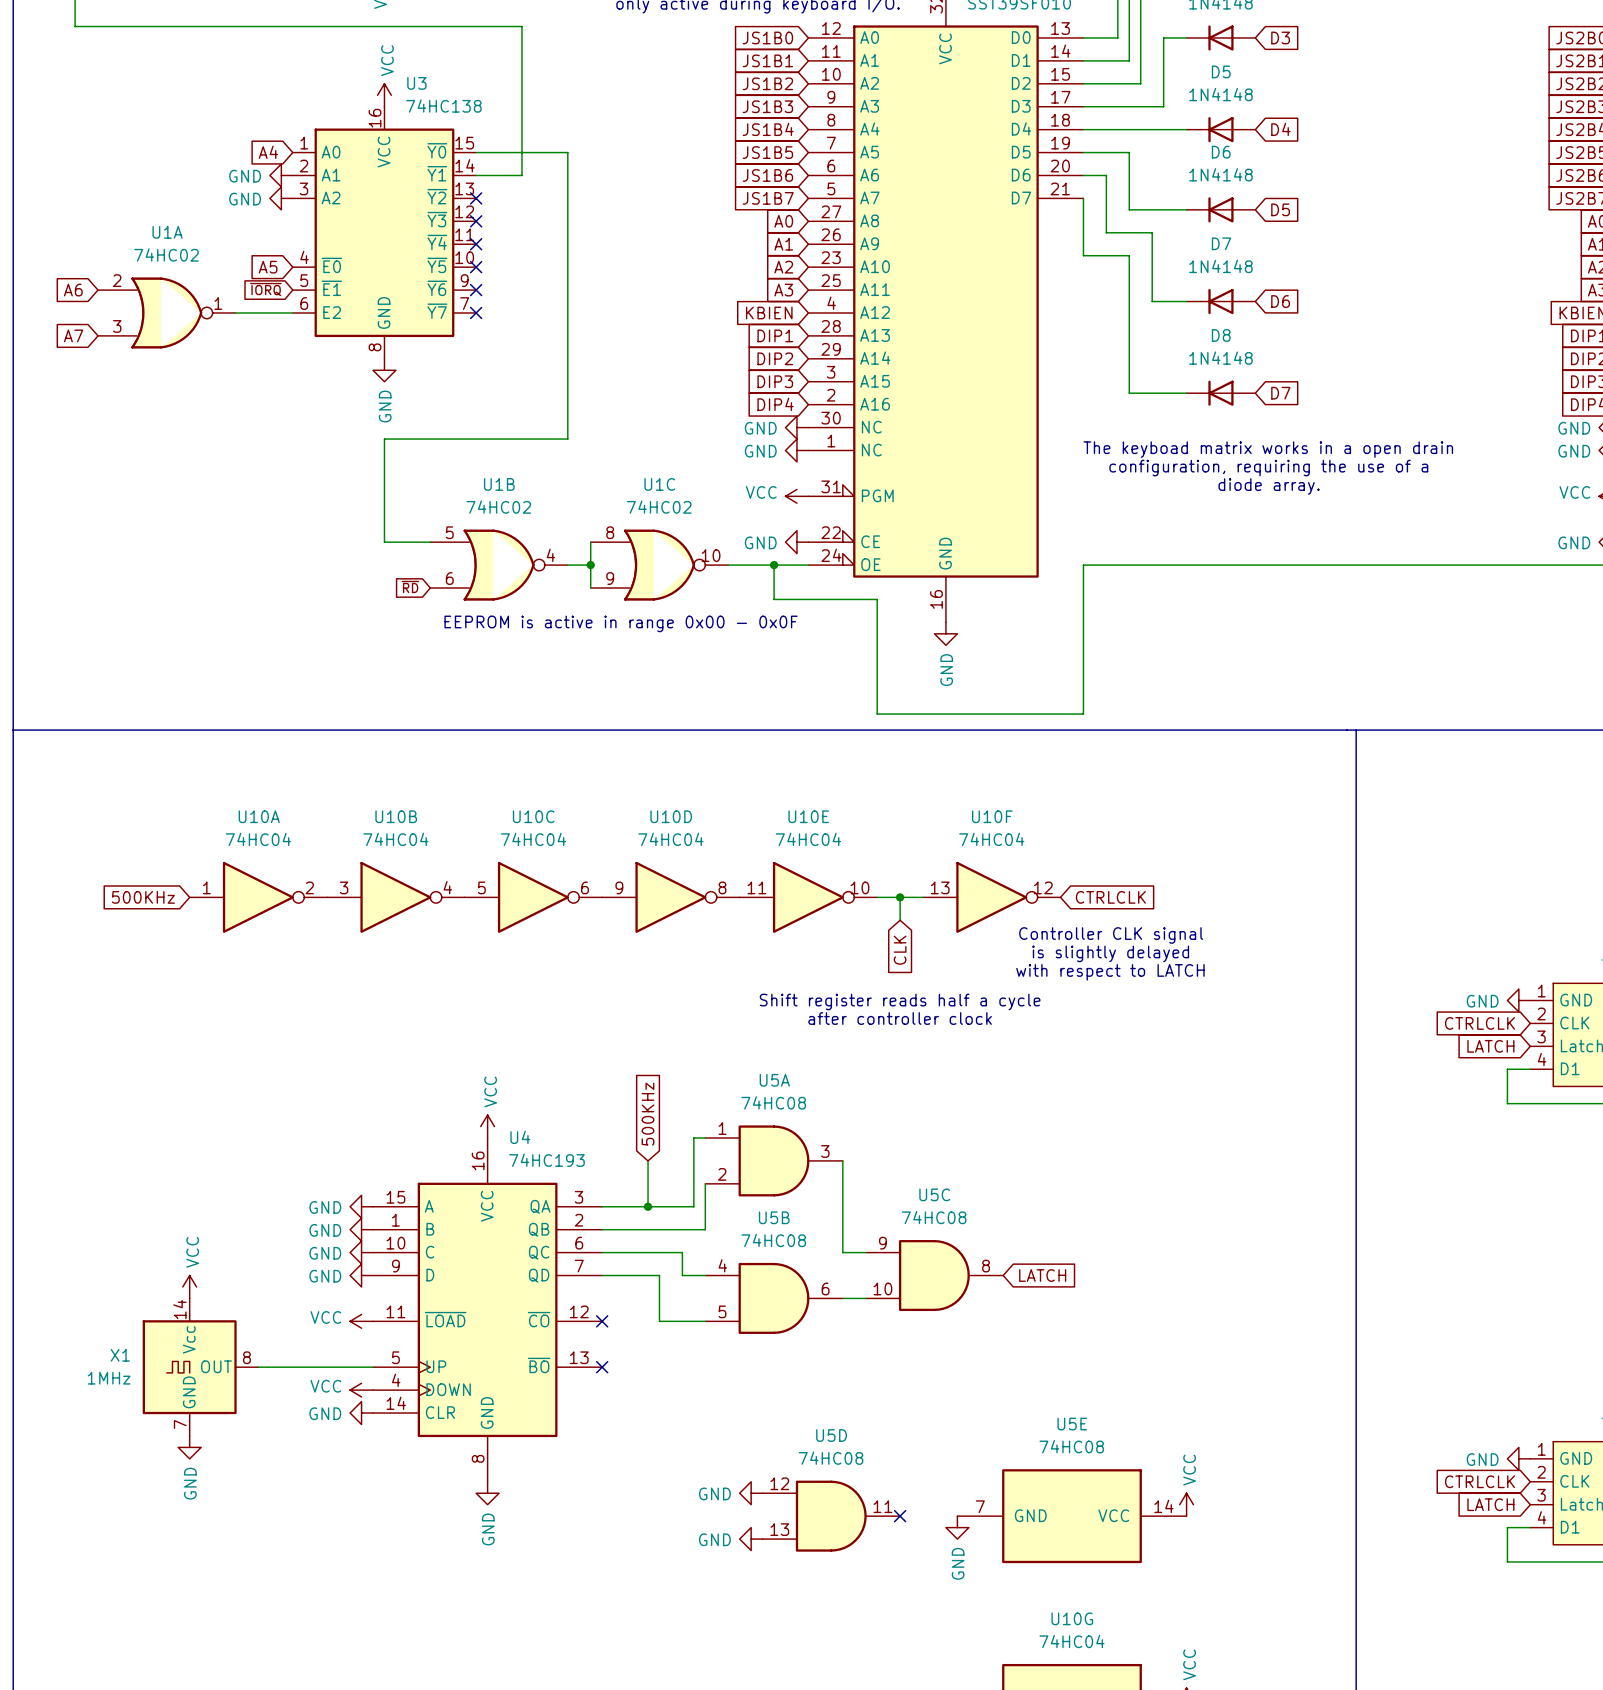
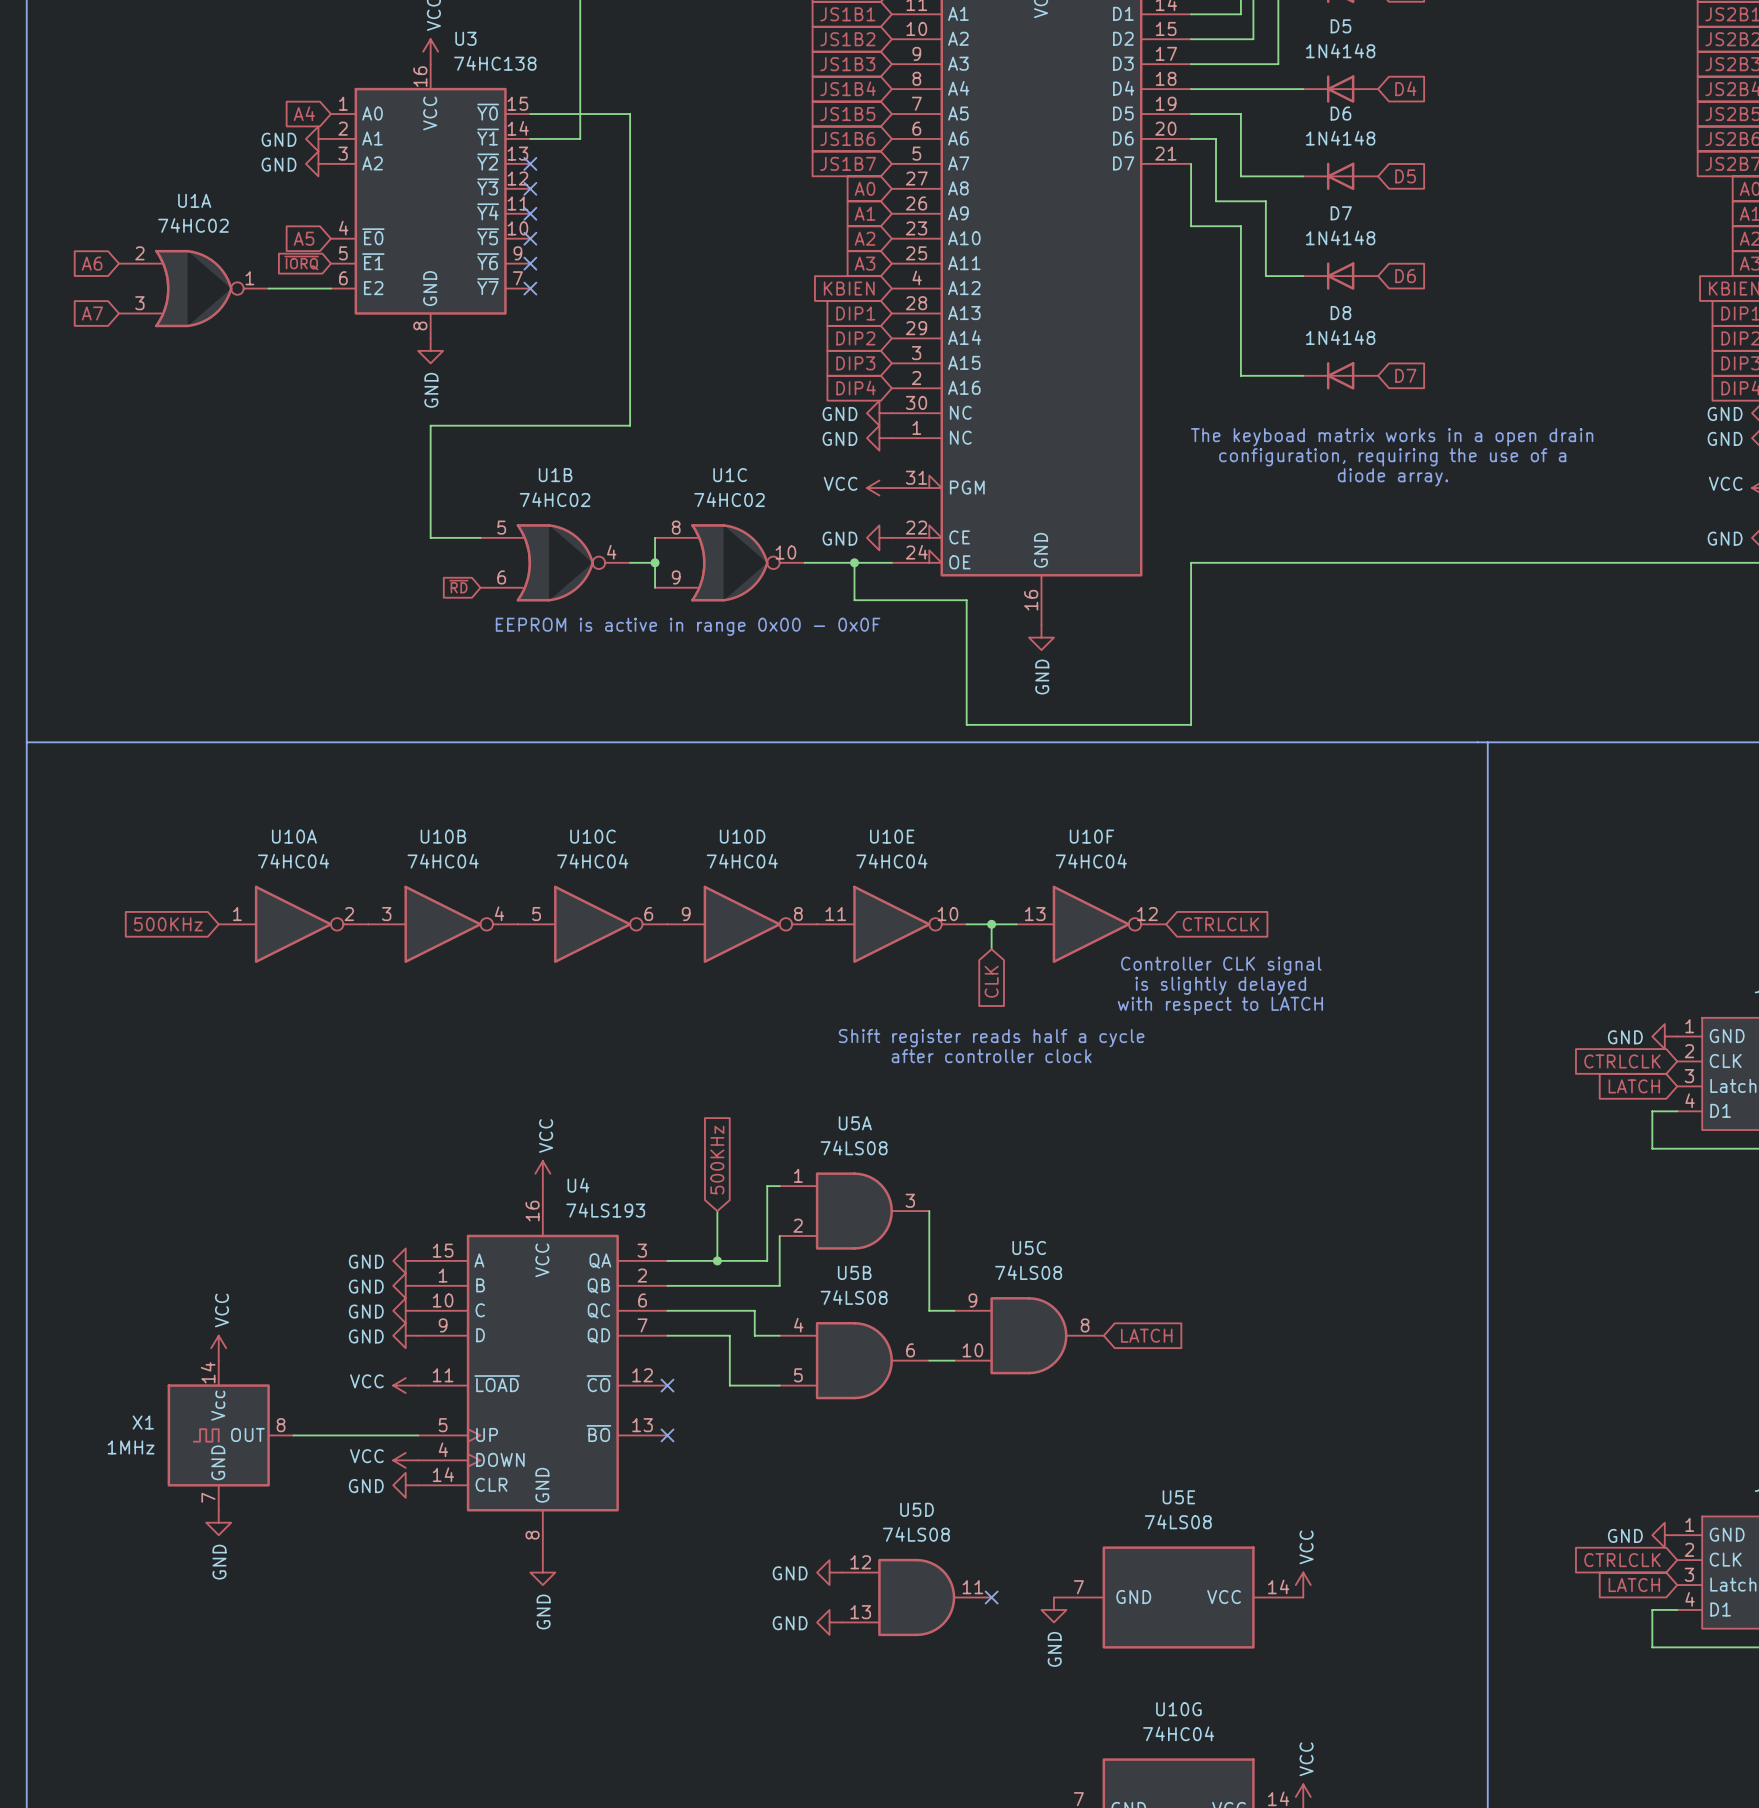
U5A value: 74HC08 (773, 1102) -> 74LS08 (854, 1147)
U4 value: 74HC193 (547, 1160) -> 74LS193 (605, 1210)
U5C value: 74HC08 (934, 1217) -> 74LS08 (1028, 1272)
U5B value: 74HC08 (773, 1240) -> 74LS08 (854, 1297)
U5E value: 74HC08 (1071, 1446) -> 74LS08 (1178, 1521)
U5D value: 74HC08 (831, 1458) -> 74LS08 (916, 1534)

